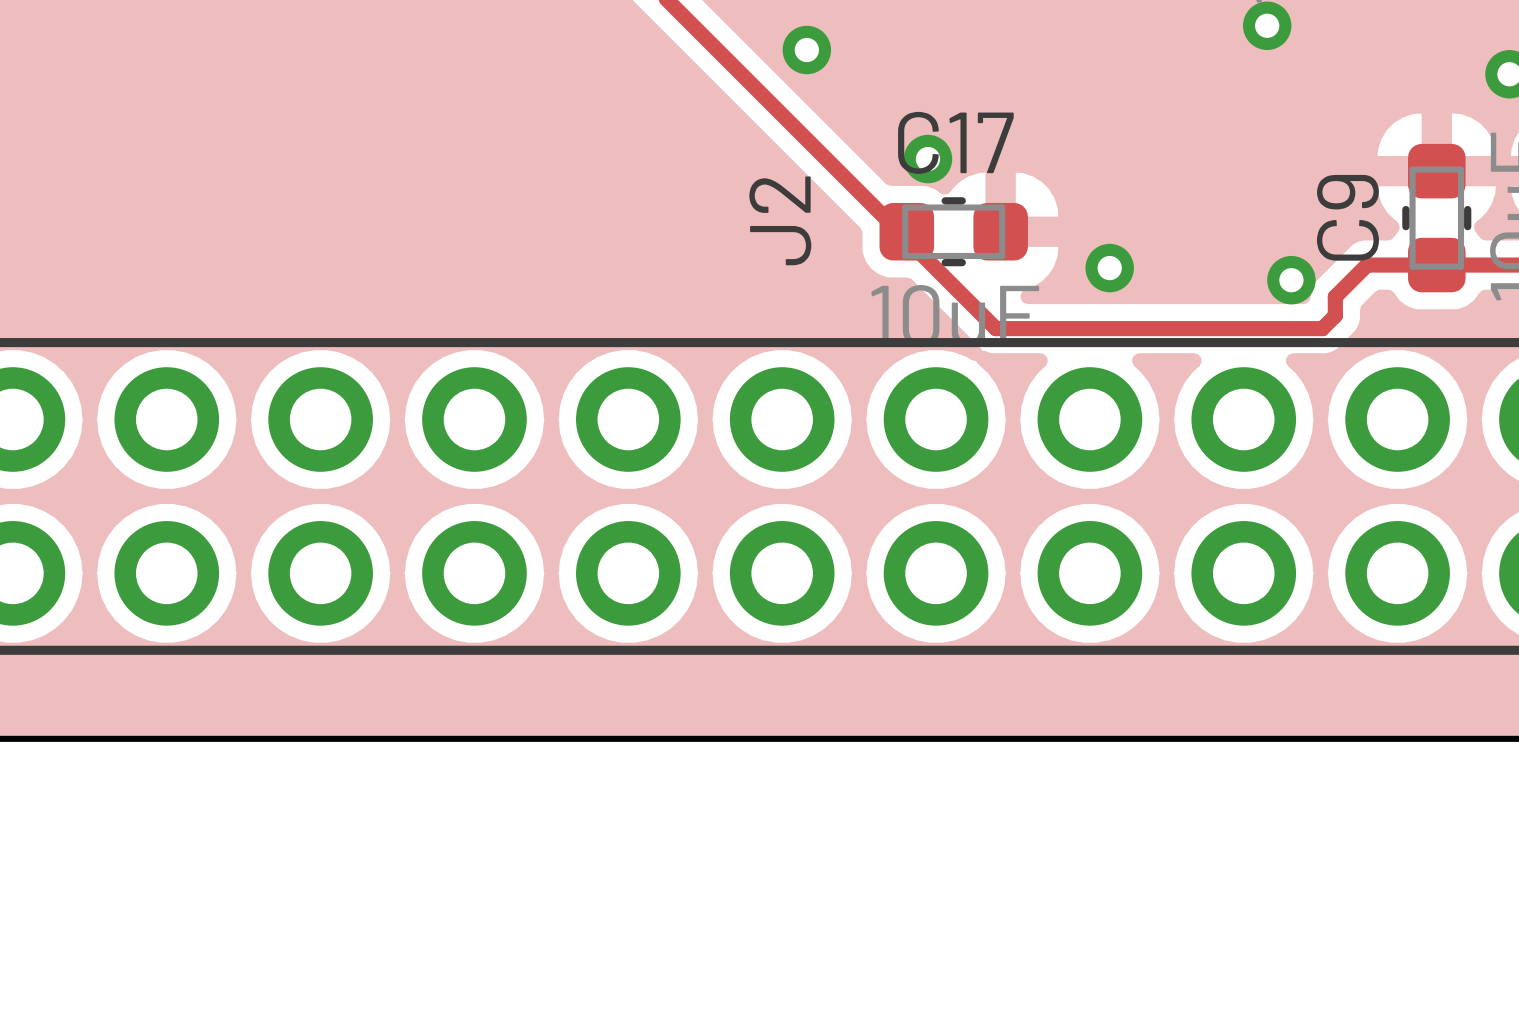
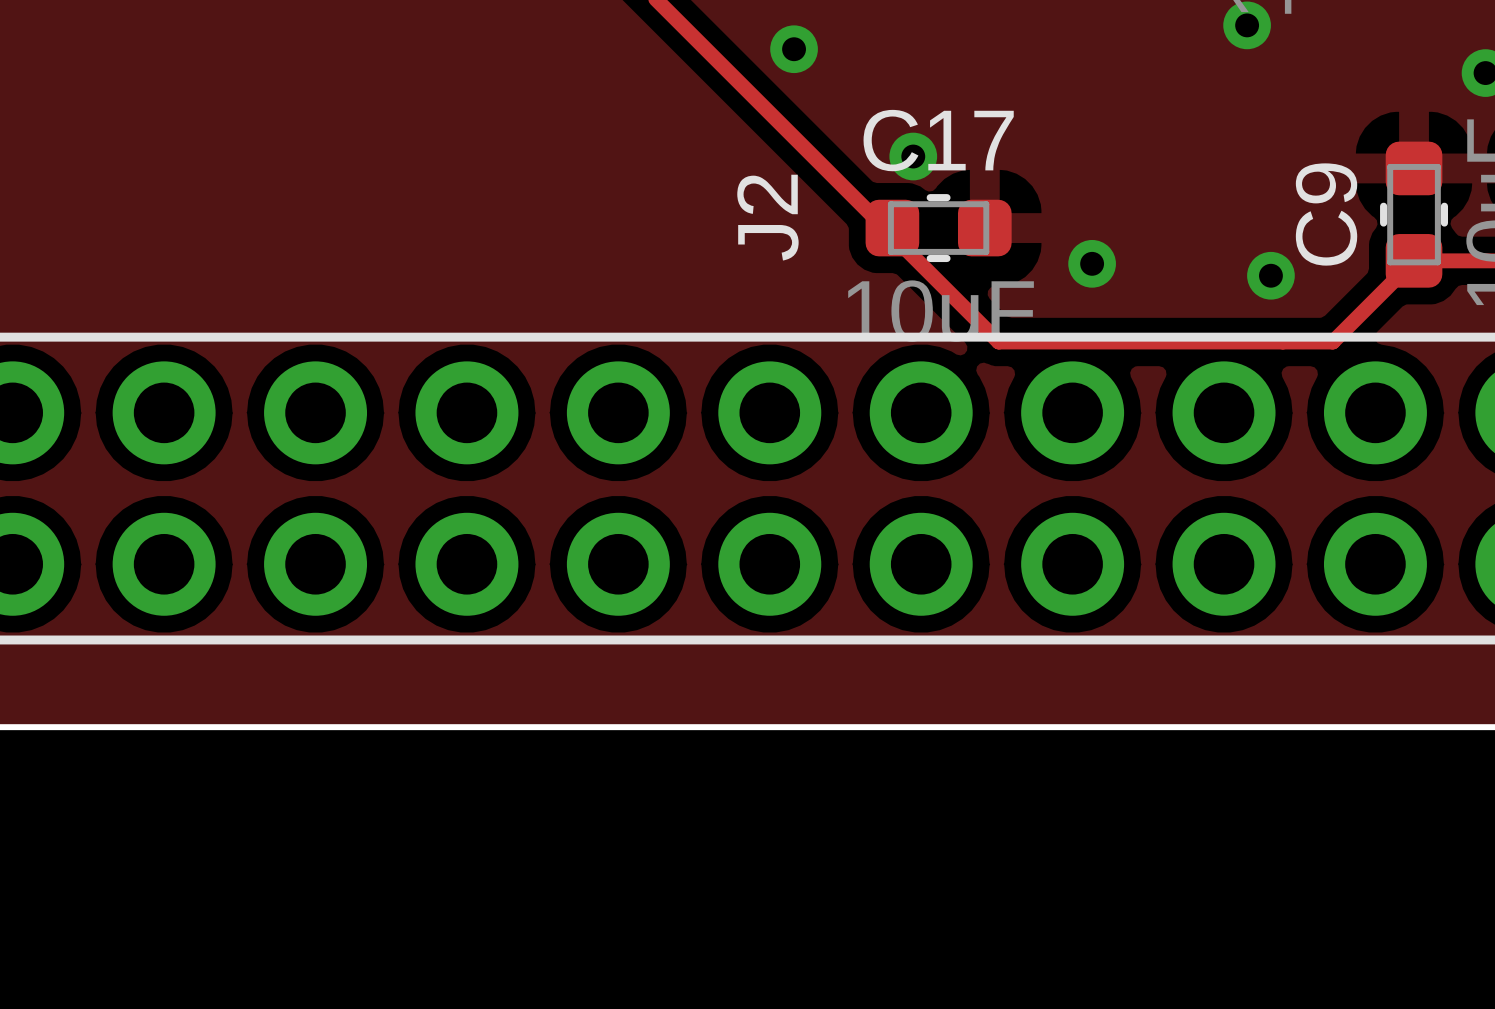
track: (1436, 265) (1367, 265) (1335, 296) (1335, 315) (1322, 328) (995, 328) -> (1414, 260) (1332, 342) (998, 342) (980, 323)

